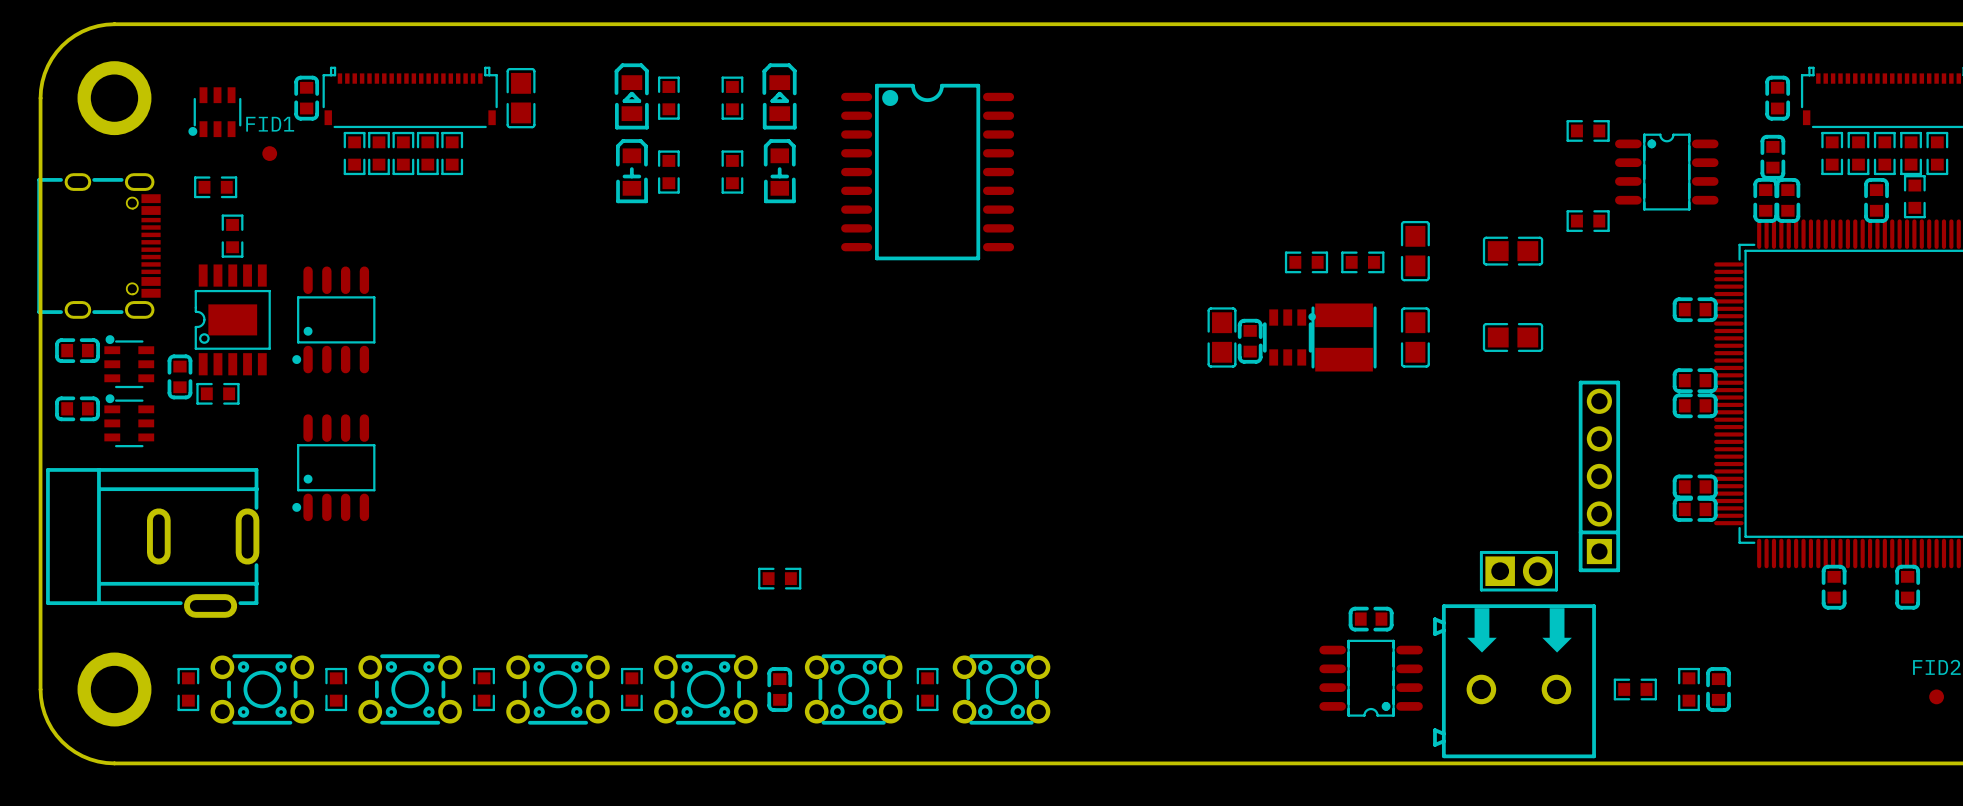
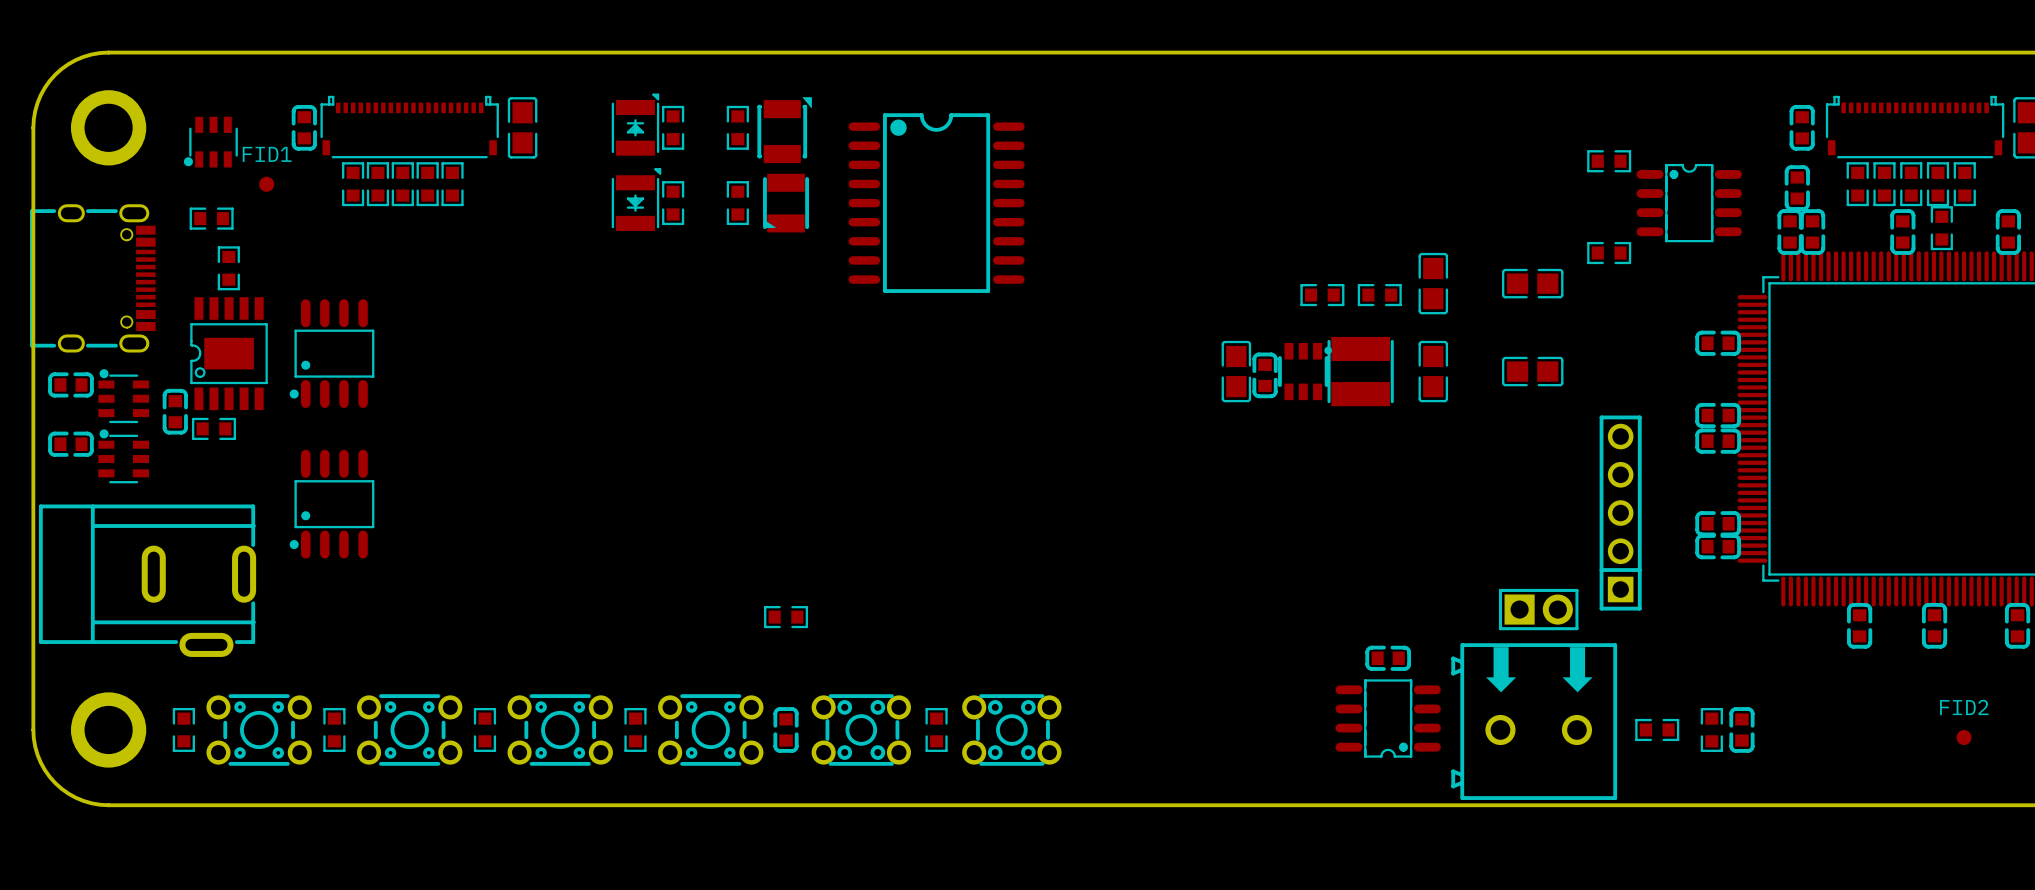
part footprint: [614, 63, 649, 130] -> [611, 93, 660, 156]
part footprint: [762, 63, 797, 130] -> [757, 97, 812, 164]
part footprint: [615, 139, 648, 204] -> [611, 168, 662, 231]
part footprint: [763, 139, 796, 204] -> [763, 173, 810, 233]

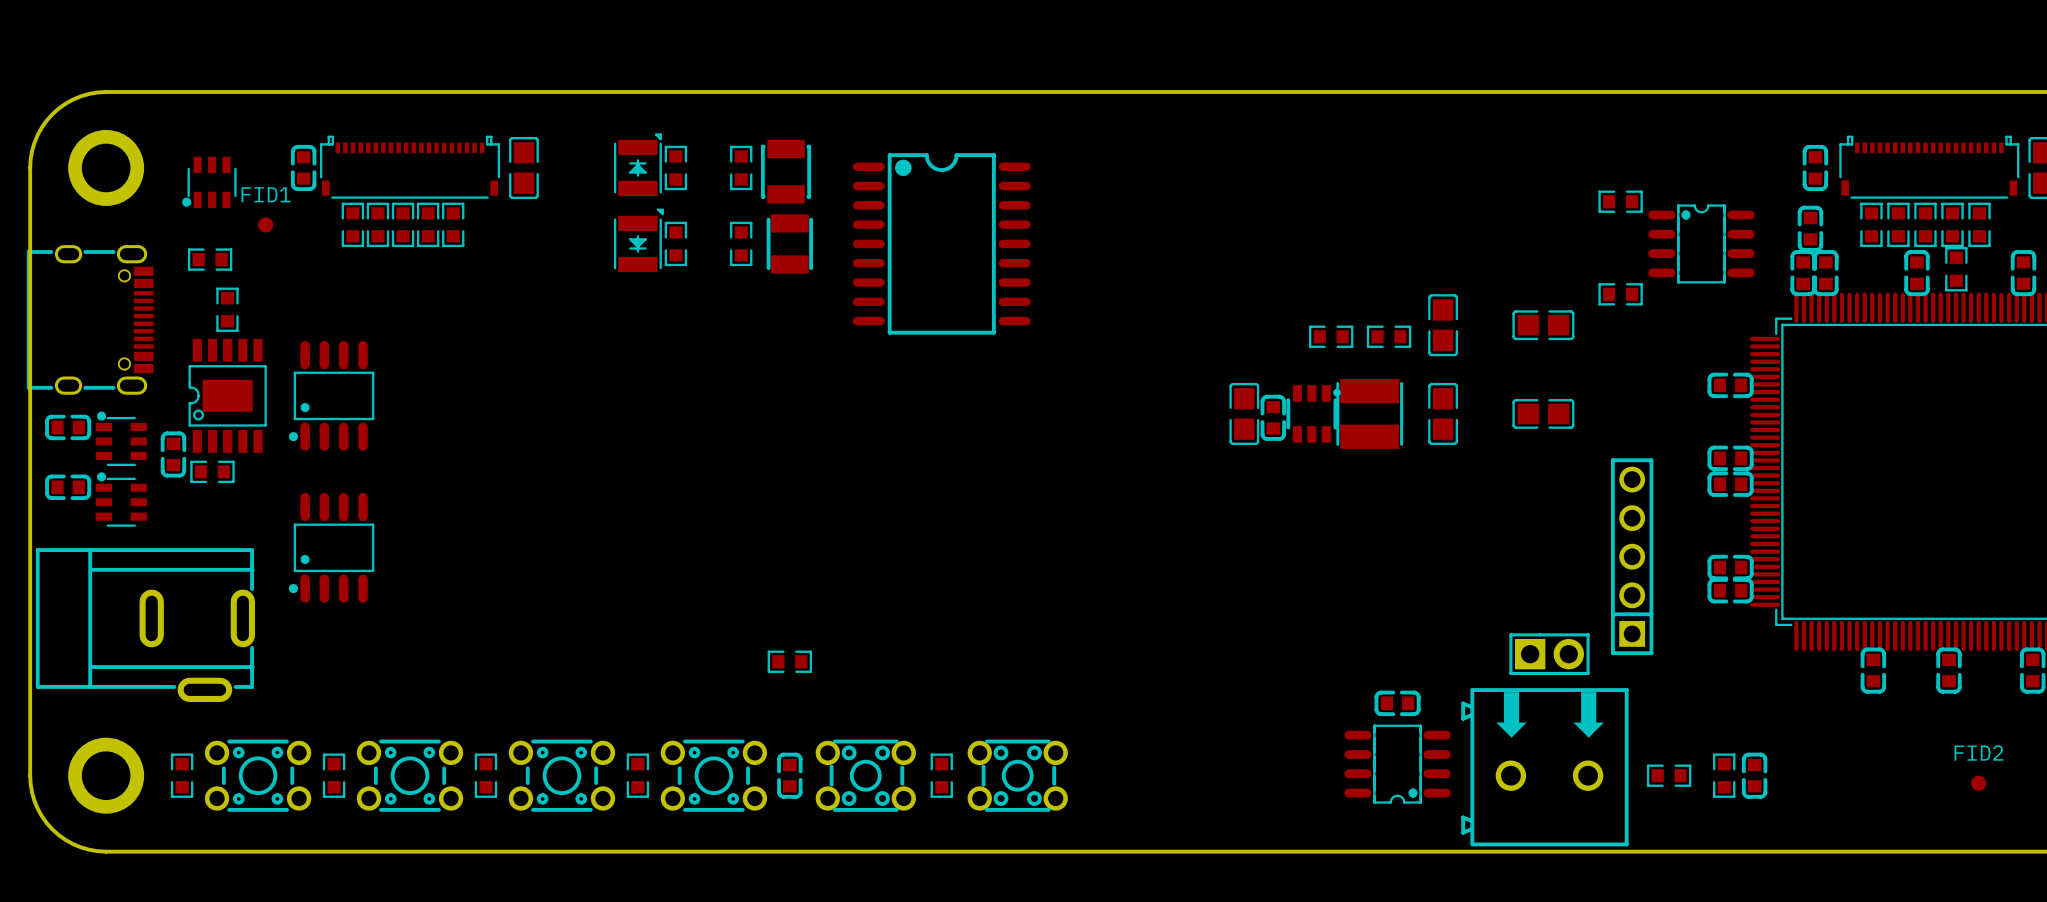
part footprint: [757, 97, 812, 164] -> [760, 139, 812, 204]
part footprint: [763, 173, 810, 233] -> [766, 214, 814, 274]

